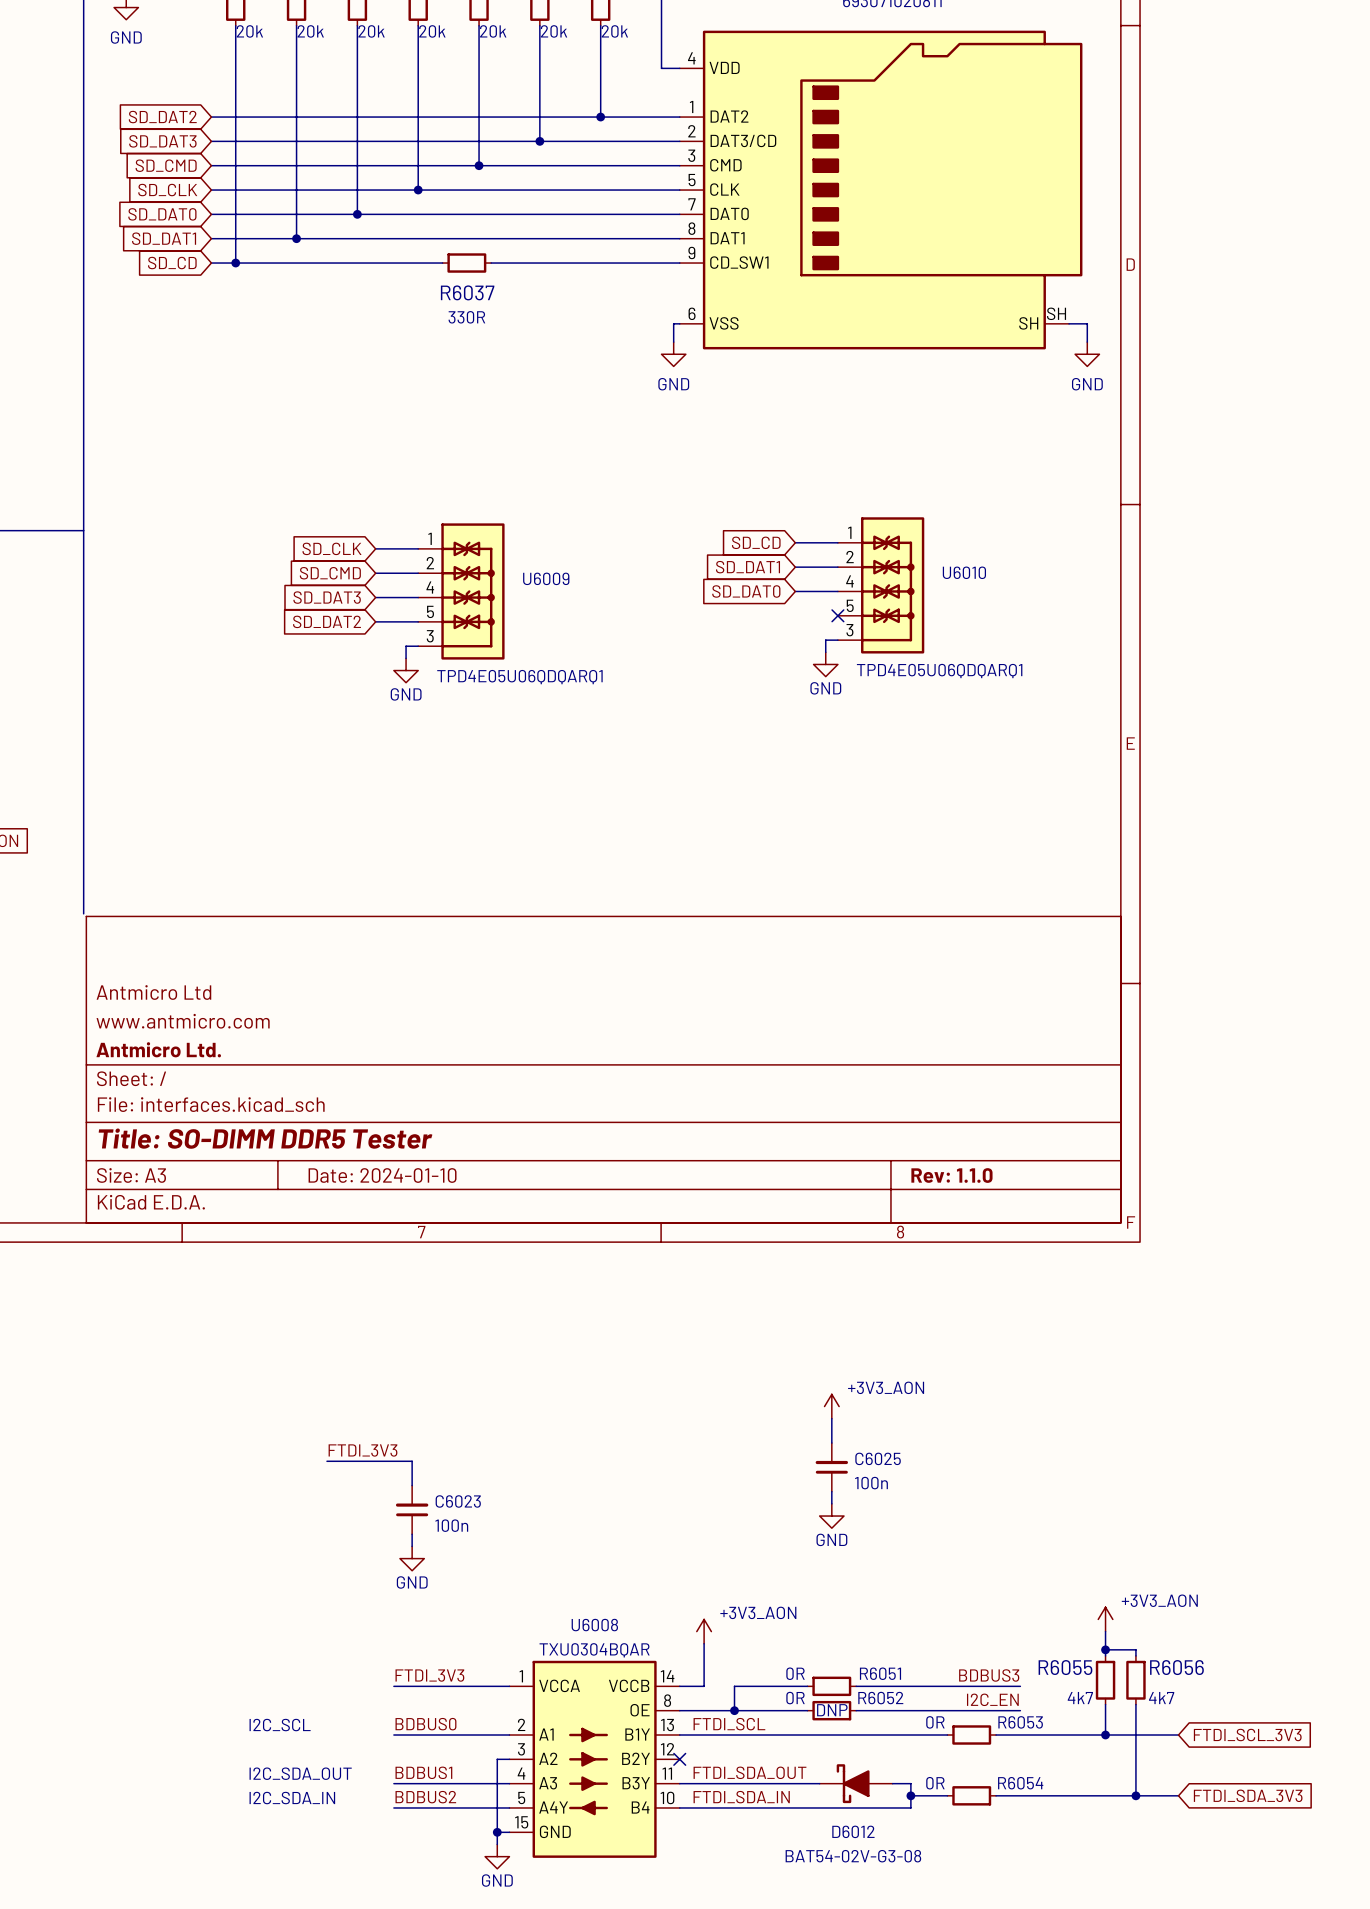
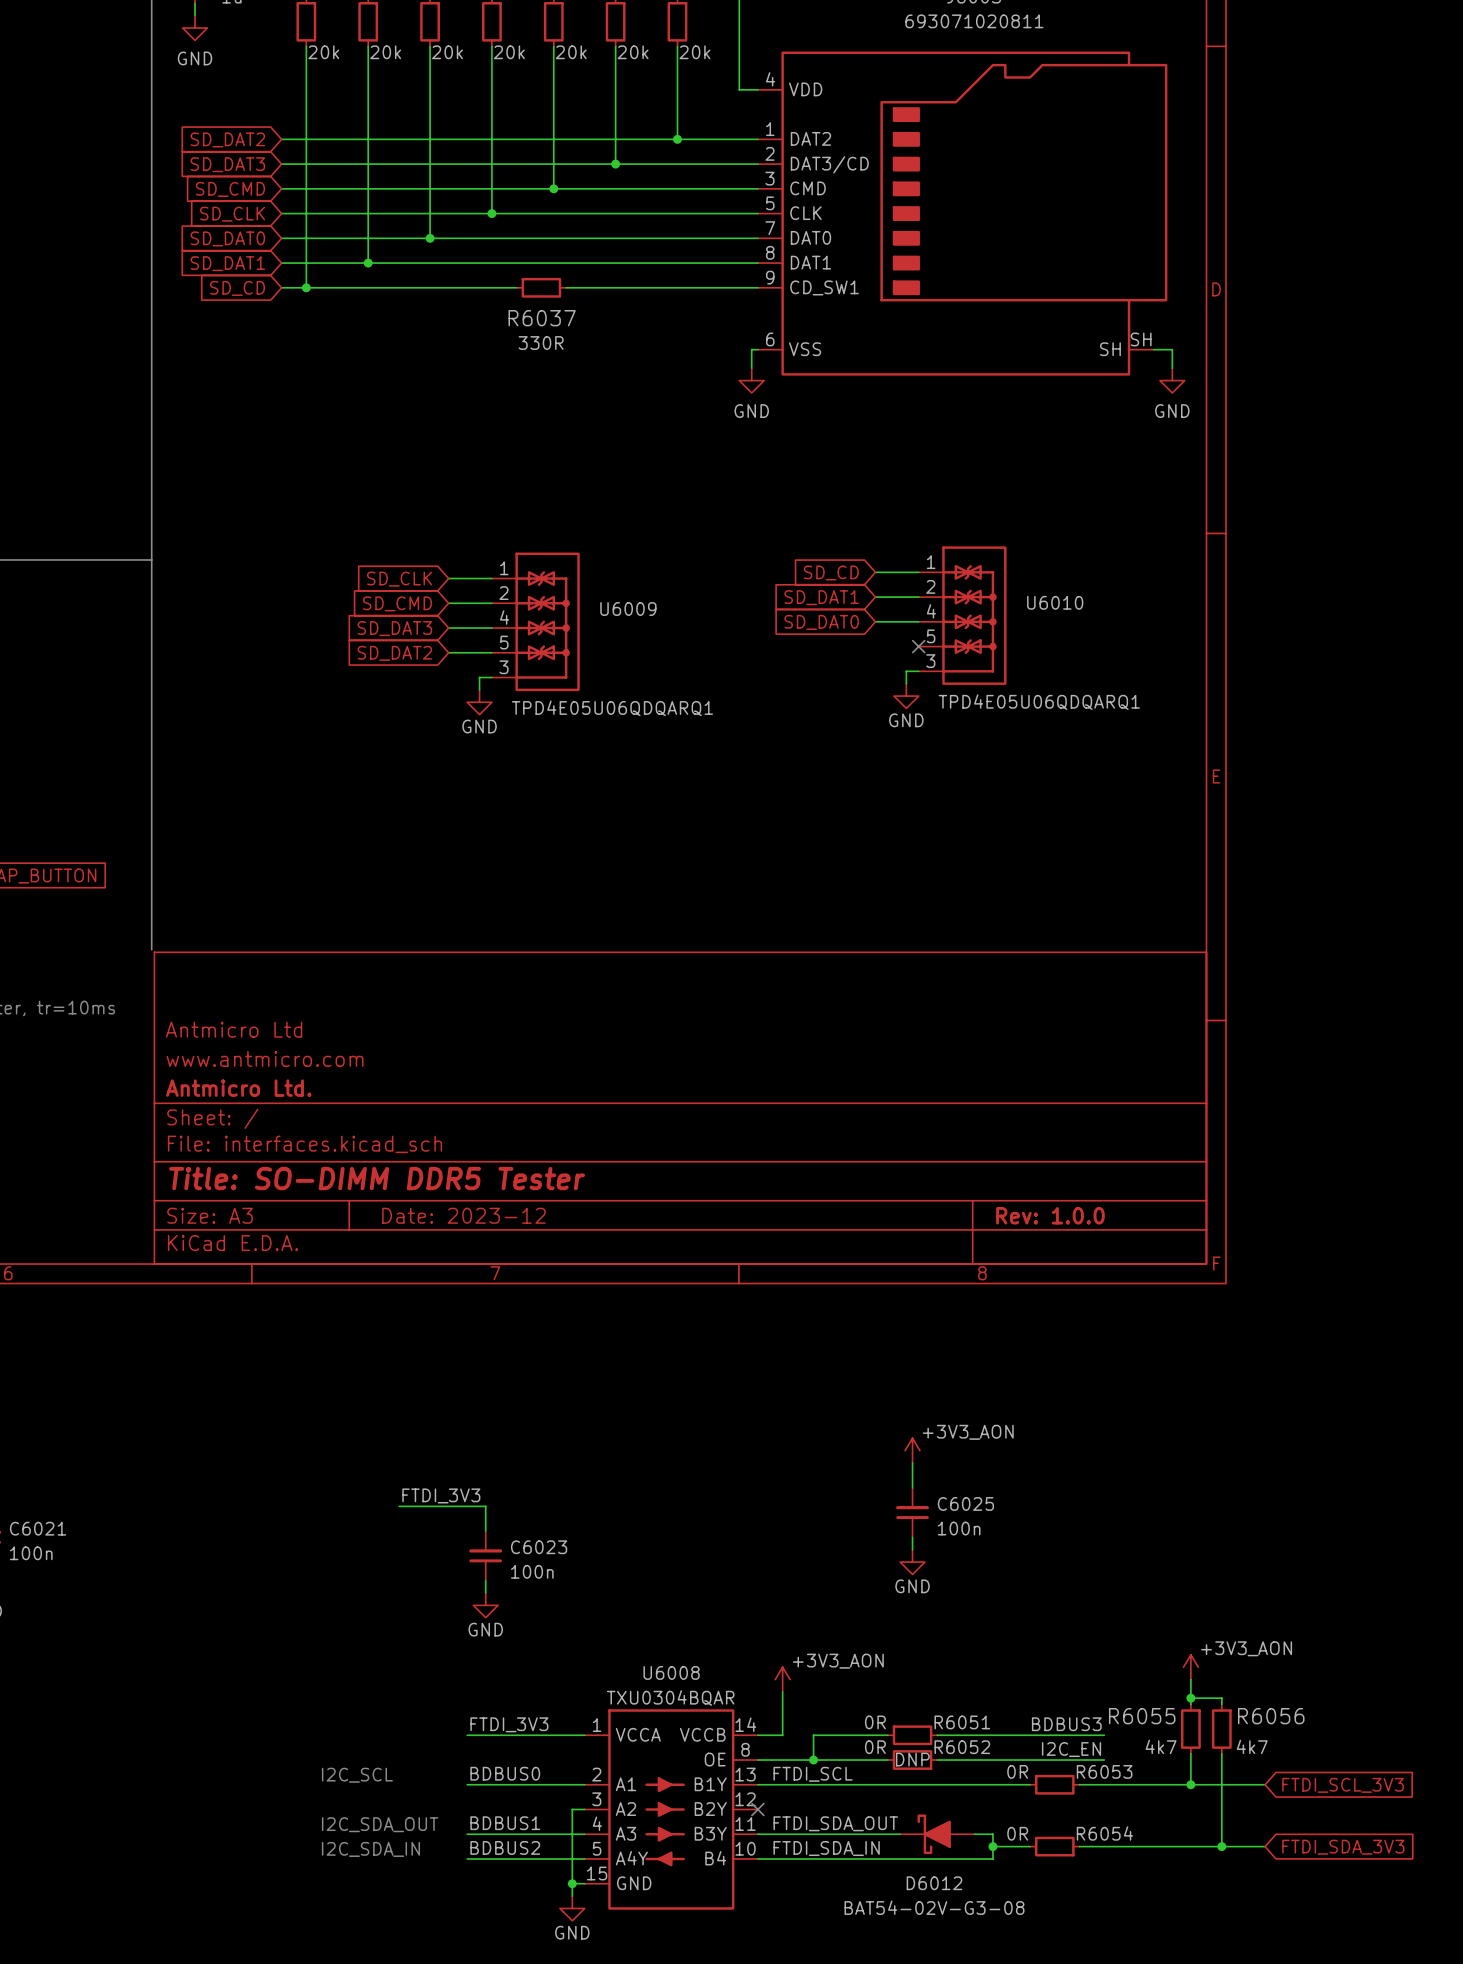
title block: Date: 2024-01-10 (382, 1175) -> Date: 2023-12 (464, 1215)
title block: Rev: 1.1.0 (951, 1175) -> Rev: 1.0.0 (1050, 1215)

